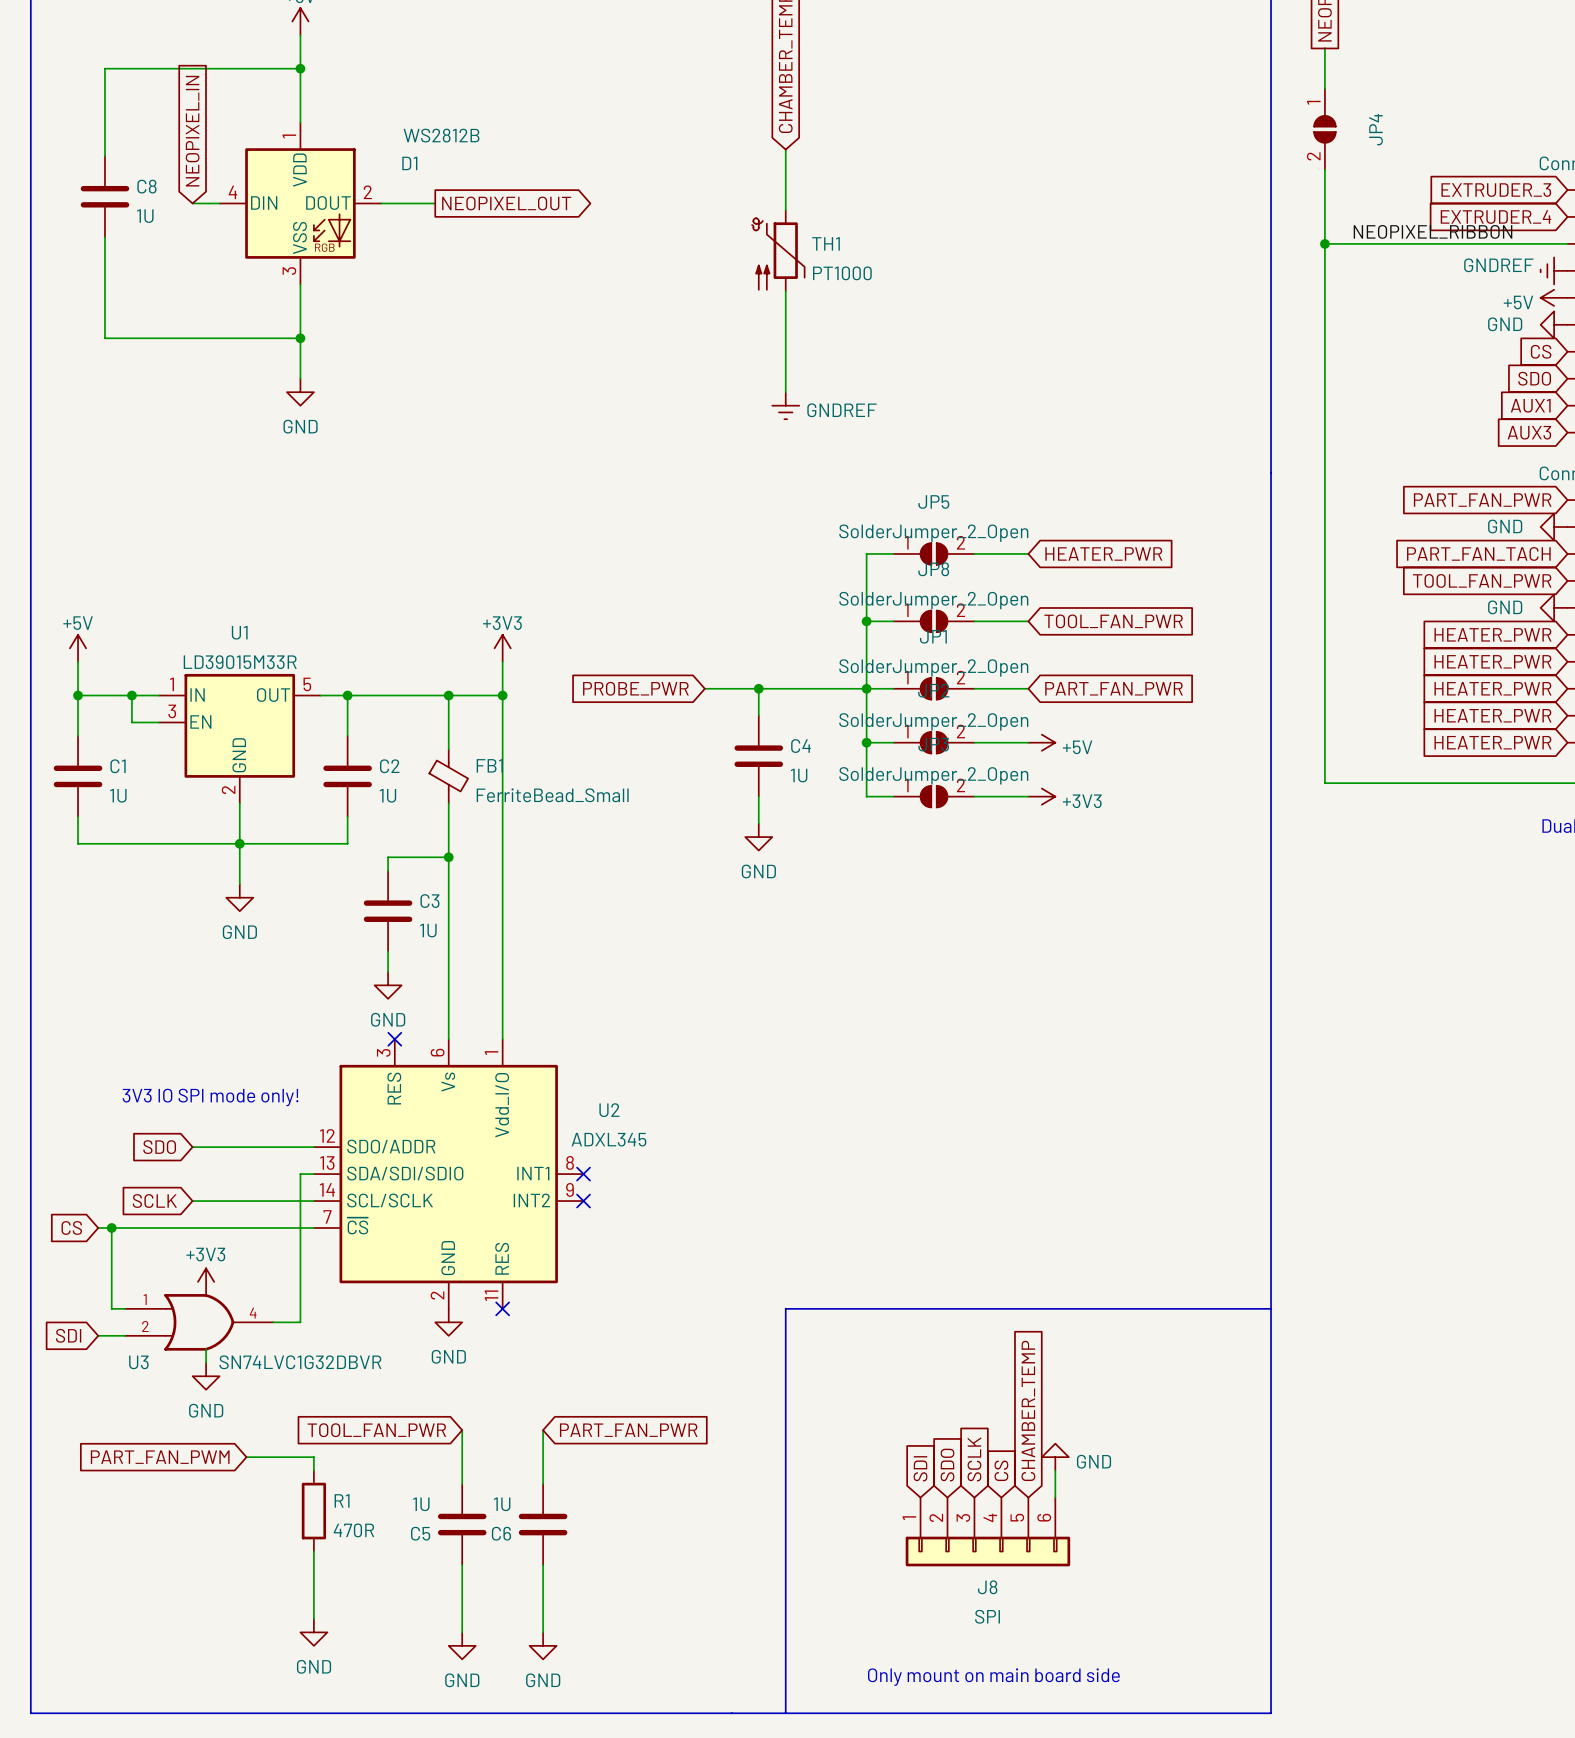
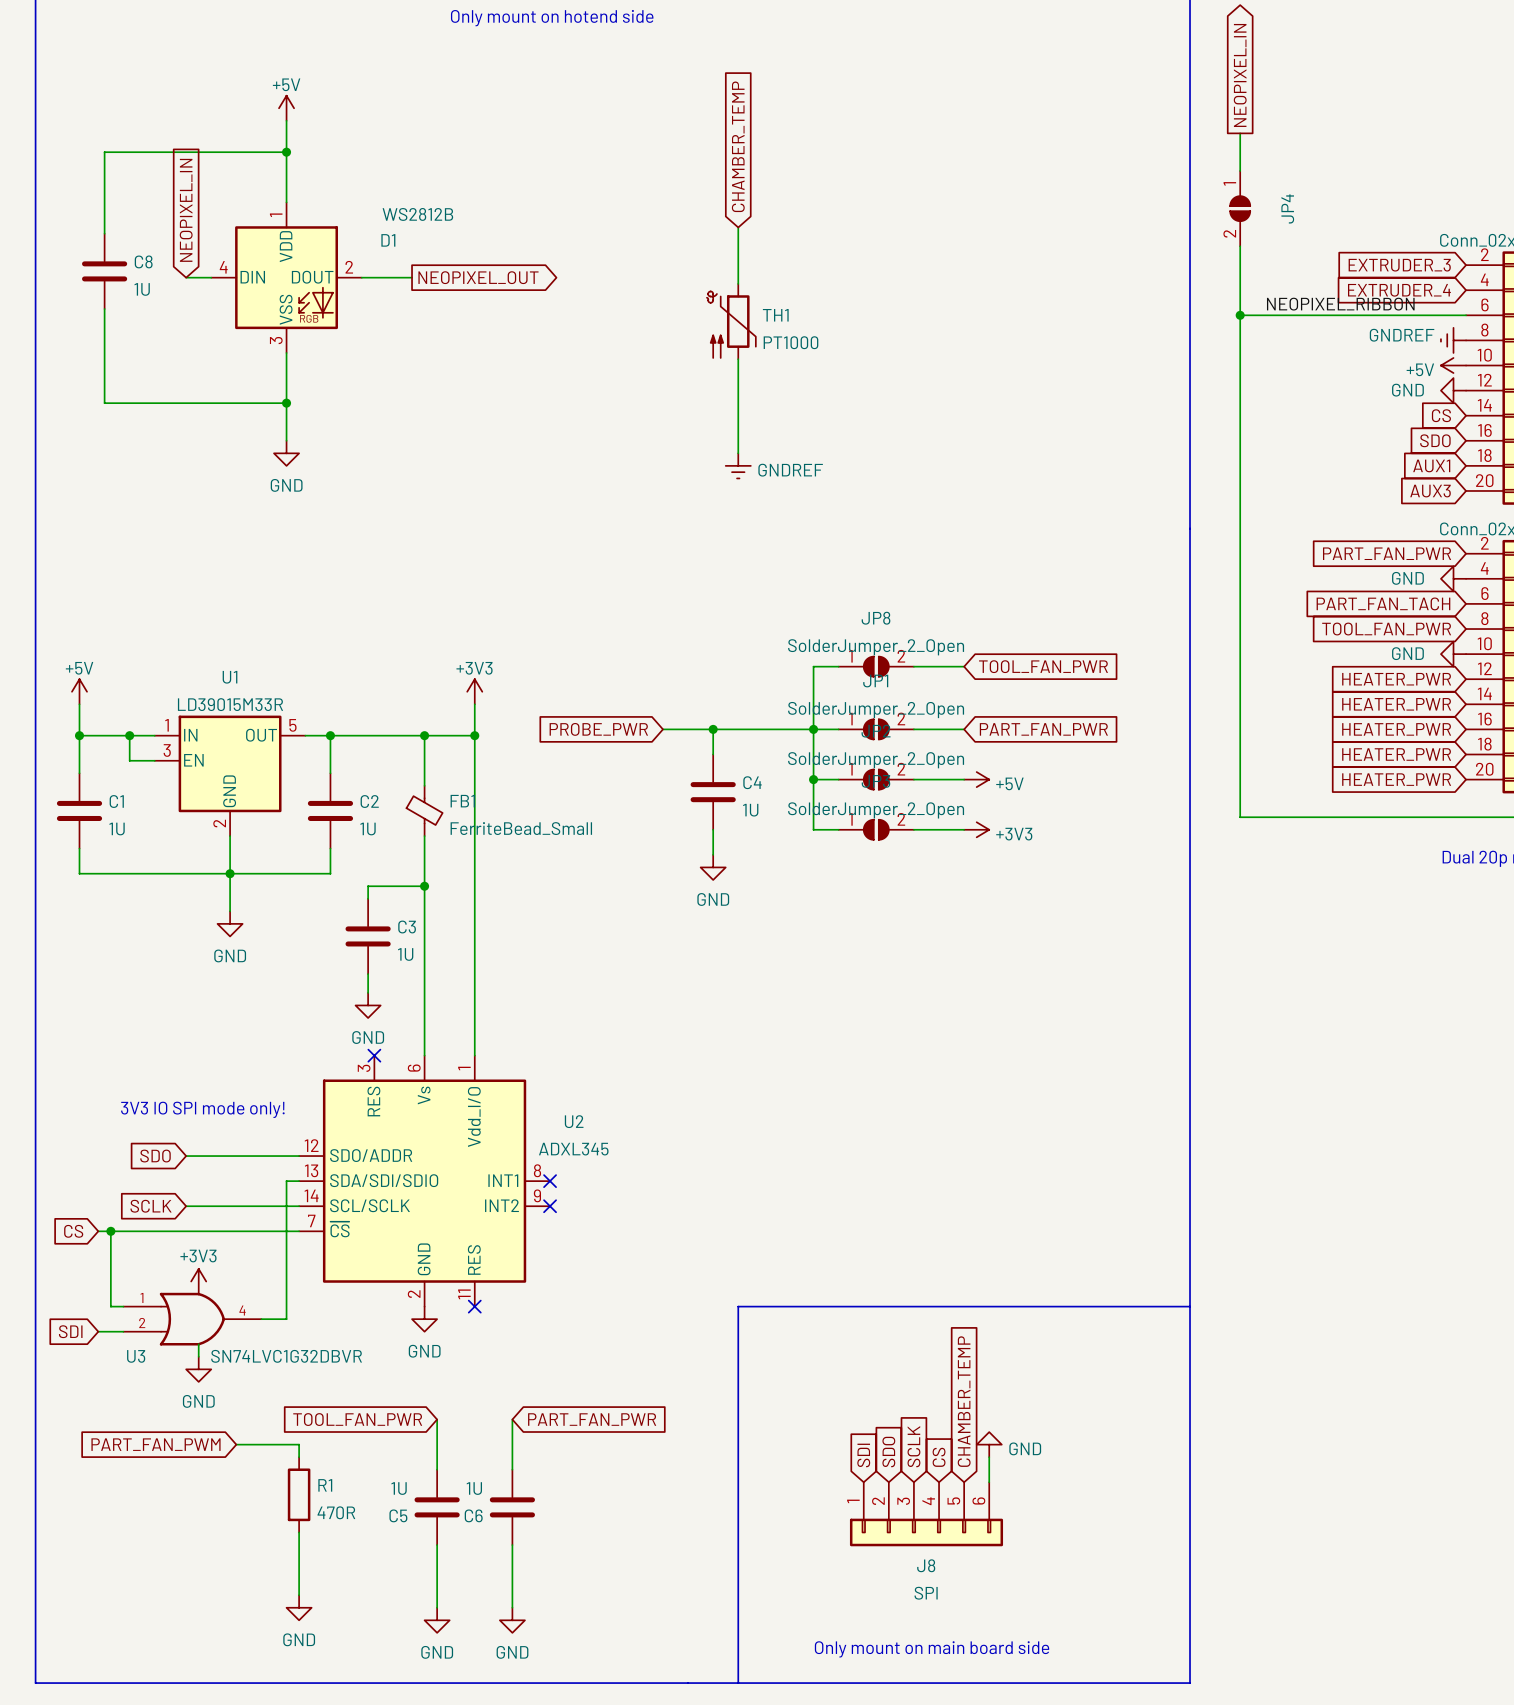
wire: (893, 553) (866, 553) (866, 621) -> none
JP5: SolderJumper_2_Open (934, 553) -> none
wire: (974, 553) (1028, 553) -> none
global label: HEATER_PWR (1103, 553) -> none
junction: (866, 621) -> none

